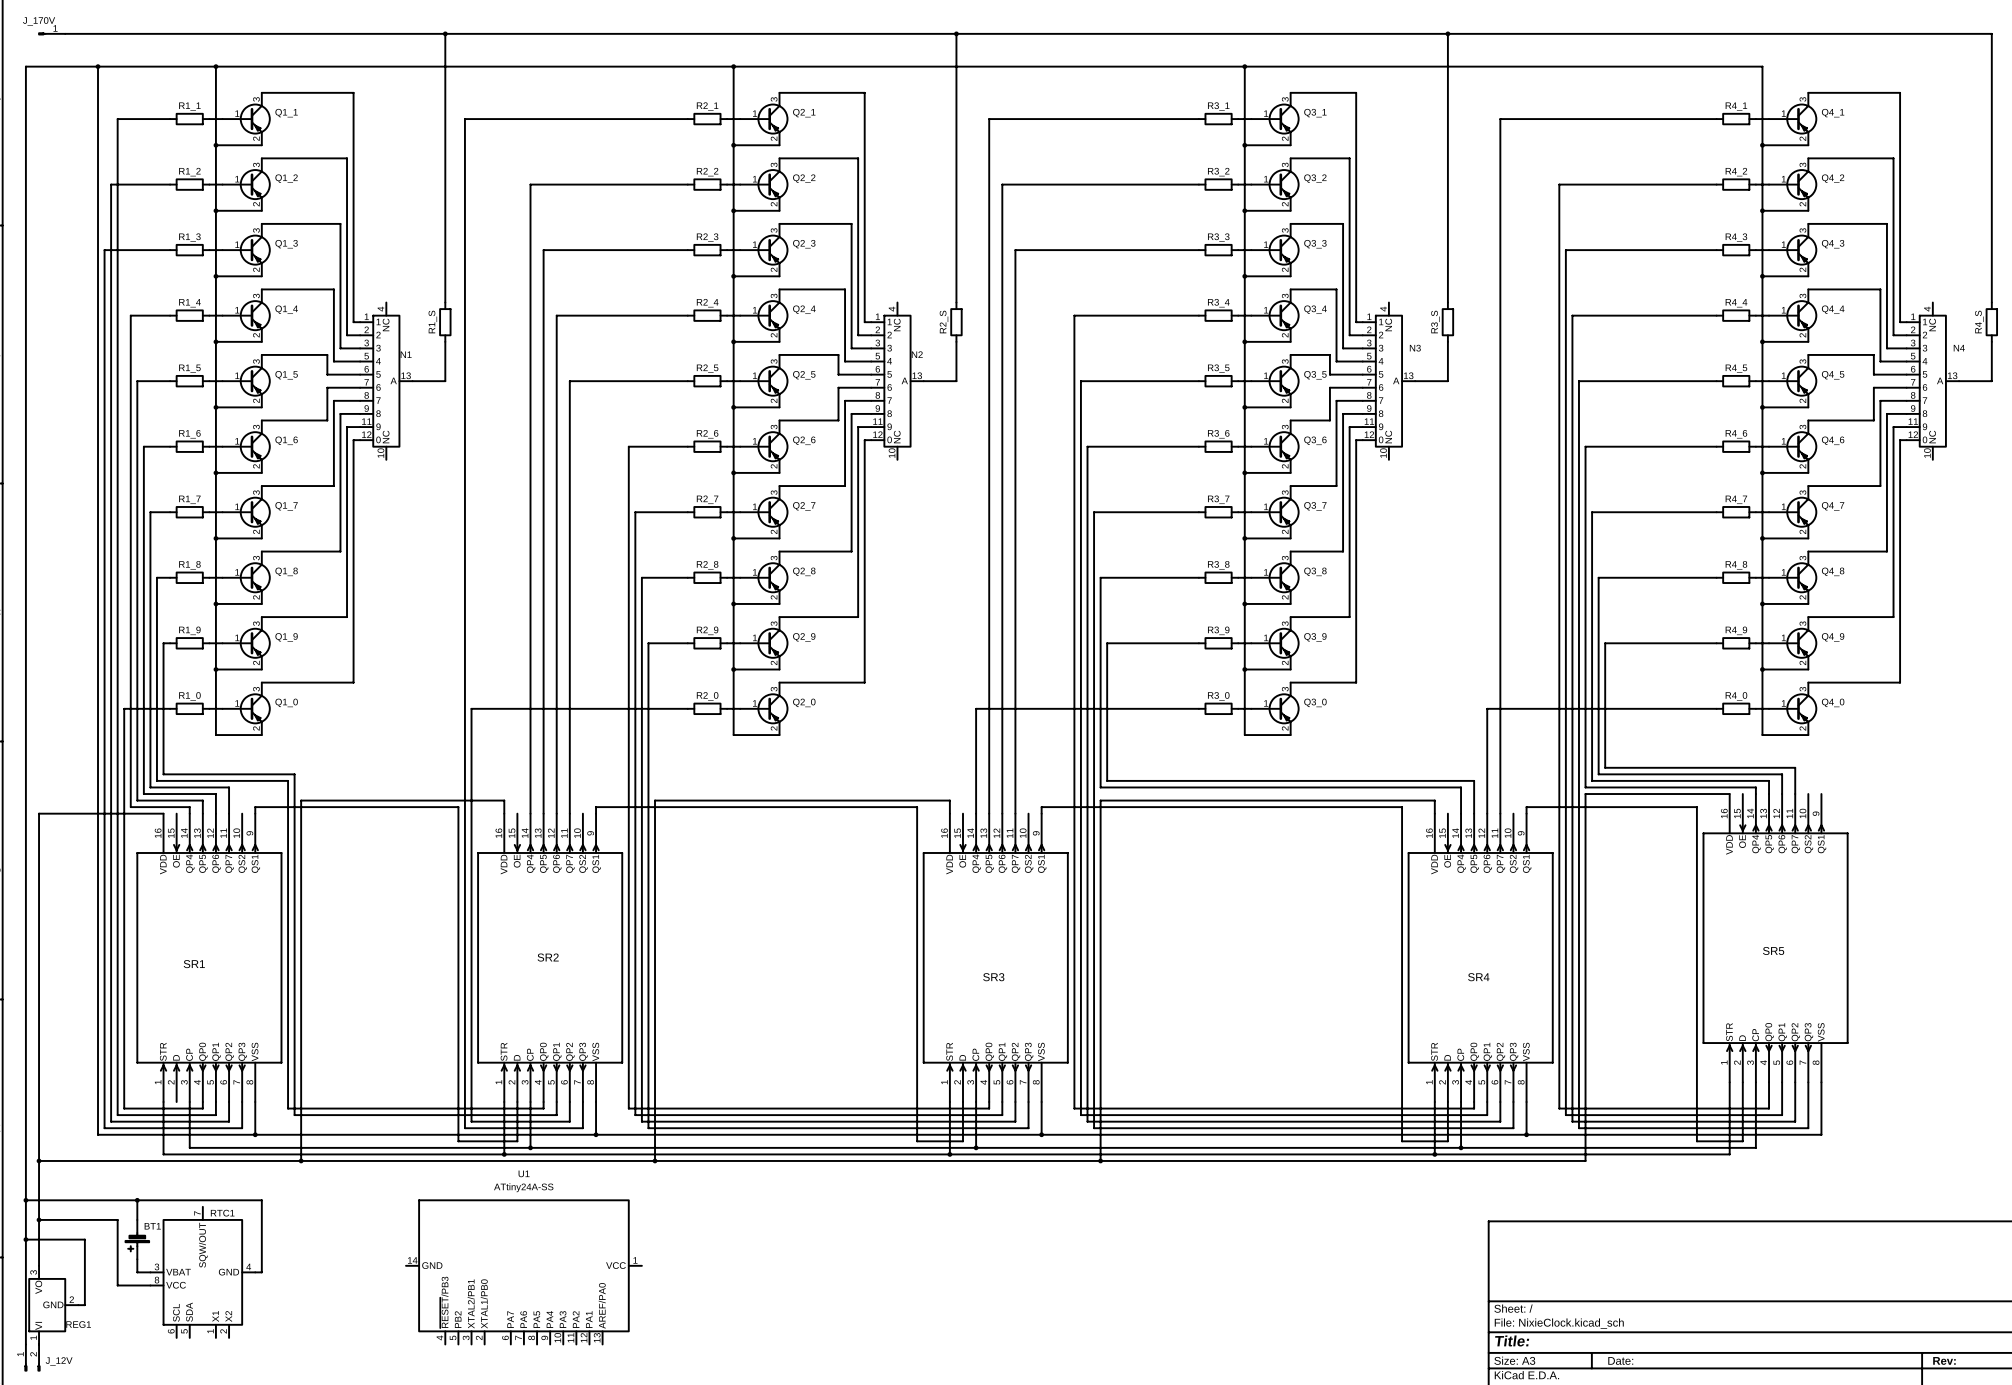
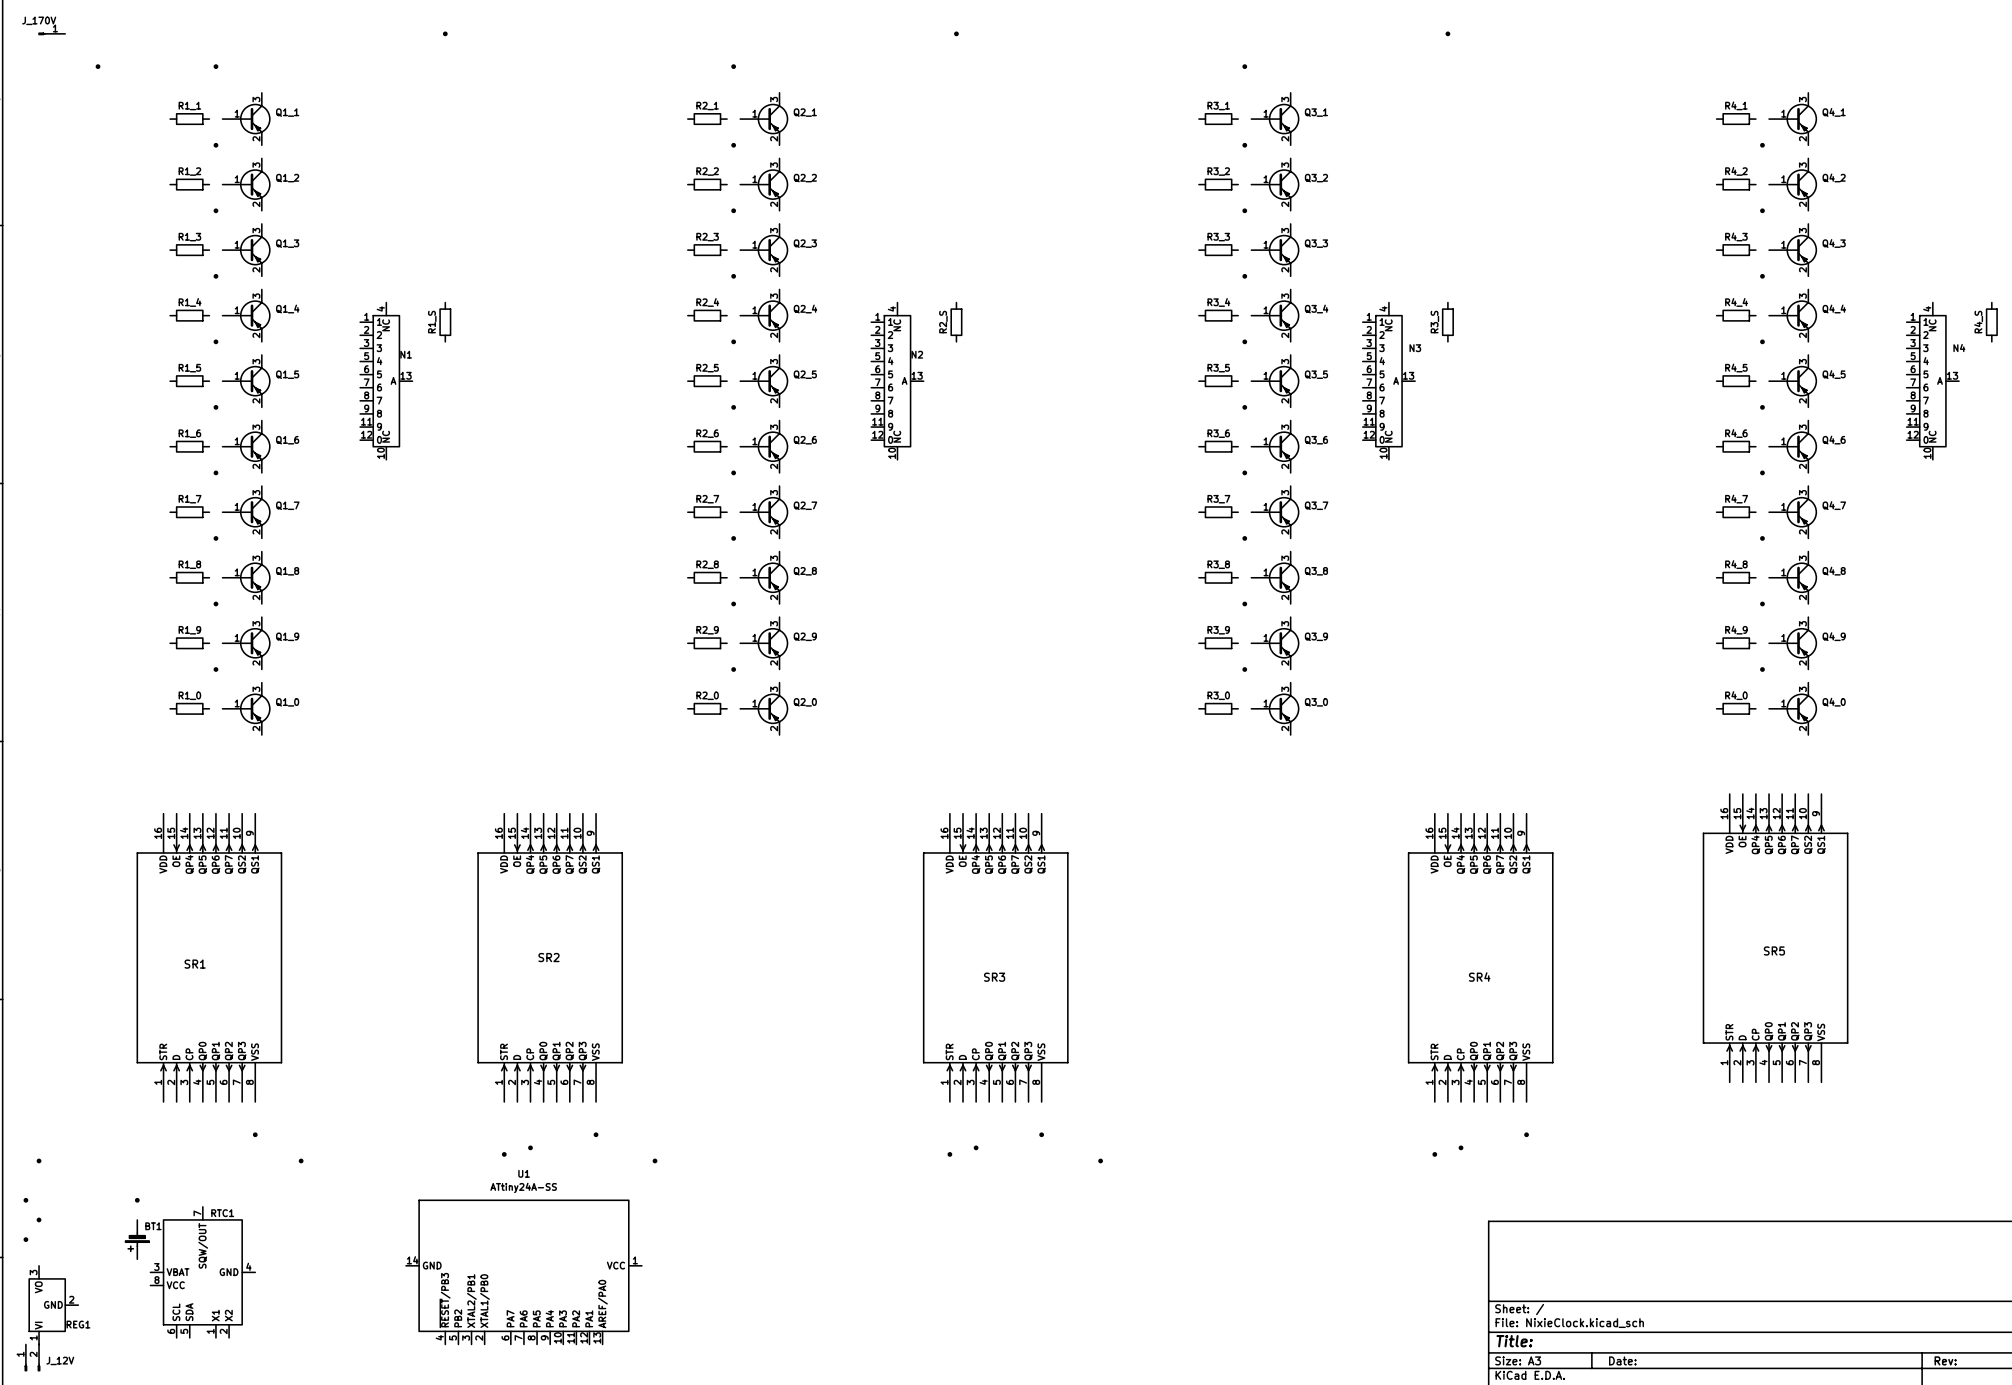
wire: (65, 33) (1991, 33) (1991, 302) -> none
wire: (445, 33) (445, 302) -> none
wire: (956, 33) (956, 302) -> none
wire: (1447, 33) (1447, 302) -> none
wire: (98, 66) (98, 1134) (1821, 1134) (1821, 1082) -> none
wire: (215, 66) (215, 735) (261, 735) -> none
wire: (733, 66) (733, 735) (779, 735) -> none
wire: (1244, 66) (1244, 735) (1290, 735) -> none
wire: (261, 92) (353, 92) (353, 322) (360, 322) -> none
wire: (779, 92) (864, 92) (864, 322) (871, 322) -> none
wire: (1290, 92) (1356, 92) (1356, 322) (1362, 322) -> none
wire: (1808, 92) (1900, 92) (1900, 322) (1906, 322) -> none
wire: (170, 119) (117, 119) (117, 1115) (215, 1115) (215, 1102) -> none
wire: (209, 119) (222, 119) -> none
wire: (687, 119) (464, 119) (464, 1128) (582, 1128) (582, 1102) -> none
wire: (727, 119) (740, 119) -> none
wire: (1198, 119) (989, 119) (989, 813) -> none
wire: (1238, 119) (1251, 119) -> none
wire: (1716, 119) (1500, 119) (1500, 813) -> none
wire: (1755, 119) (1769, 119) -> none
wire: (215, 145) (261, 145) -> none
wire: (733, 145) (779, 145) -> none
wire: (1244, 145) (1290, 145) -> none
wire: (1762, 145) (1808, 145) -> none
wire: (261, 158) (347, 158) (347, 335) (360, 335) -> none
wire: (779, 158) (858, 158) (858, 335) (871, 335) -> none
wire: (1290, 158) (1349, 158) (1349, 335) (1362, 335) -> none
wire: (1808, 158) (1893, 158) (1893, 335) (1906, 335) -> none
wire: (170, 184) (111, 184) (111, 1121) (229, 1121) (229, 1102) -> none
wire: (209, 184) (222, 184) -> none
wire: (687, 184) (530, 184) (530, 813) -> none
wire: (727, 184) (740, 184) -> none
wire: (1198, 184) (1002, 184) (1002, 813) -> none
wire: (1238, 184) (1251, 184) -> none
wire: (1716, 184) (1559, 184) (1559, 1108) (1769, 1108) (1769, 1082) -> none
wire: (1755, 184) (1769, 184) -> none
wire: (215, 210) (261, 210) -> none
wire: (733, 210) (779, 210) -> none
wire: (1244, 210) (1290, 210) -> none
wire: (1762, 210) (1808, 210) -> none
wire: (261, 223) (340, 223) (340, 348) (360, 348) -> none
wire: (779, 223) (851, 223) (851, 348) (871, 348) -> none
wire: (1290, 223) (1343, 223) (1343, 348) (1362, 348) -> none
wire: (1808, 223) (1886, 223) (1886, 348) (1906, 348) -> none
wire: (170, 250) (104, 250) (104, 1128) (242, 1128) (242, 1102) -> none
wire: (209, 250) (222, 250) -> none
wire: (687, 250) (543, 250) (543, 813) -> none
wire: (727, 250) (740, 250) -> none
wire: (1198, 250) (1015, 250) (1015, 813) -> none
wire: (1238, 250) (1251, 250) -> none
wire: (1716, 250) (1565, 250) (1565, 1115) (1782, 1115) (1782, 1082) -> none
wire: (1755, 250) (1769, 250) -> none
wire: (215, 276) (261, 276) -> none
wire: (733, 276) (779, 276) -> none
wire: (1244, 276) (1290, 276) -> none
wire: (1762, 276) (1808, 276) -> none
wire: (261, 289) (333, 289) (333, 361) (360, 361) -> none
wire: (779, 289) (845, 289) (845, 361) (871, 361) -> none
wire: (1290, 289) (1336, 289) (1336, 361) (1362, 361) -> none
wire: (1808, 289) (1880, 289) (1880, 361) (1906, 361) -> none
wire: (170, 315) (130, 315) (130, 807) (189, 807) (189, 813) -> none
wire: (209, 315) (222, 315) -> none
wire: (687, 315) (556, 315) (556, 813) -> none
wire: (727, 315) (740, 315) -> none
wire: (1198, 315) (1074, 315) (1074, 1108) (1474, 1108) (1474, 1102) -> none
wire: (1238, 315) (1251, 315) -> none
wire: (1716, 315) (1572, 315) (1572, 1121) (1795, 1121) (1795, 1082) -> none
wire: (1755, 315) (1769, 315) -> none
wire: (215, 341) (261, 341) -> none
wire: (445, 341) (445, 381) (412, 381) -> none
wire: (733, 341) (779, 341) -> none
wire: (956, 341) (956, 381) (923, 381) -> none
wire: (1244, 341) (1290, 341) -> none
wire: (1447, 341) (1447, 381) (1415, 381) -> none
wire: (1762, 341) (1808, 341) -> none
wire: (1991, 341) (1991, 381) (1959, 381) -> none
wire: (261, 354) (327, 354) (327, 374) (360, 374) -> none
wire: (779, 354) (838, 354) (838, 374) (871, 374) -> none
wire: (1290, 354) (1329, 354) (1329, 374) (1362, 374) -> none
wire: (1808, 354) (1873, 354) (1873, 374) (1906, 374) -> none
wire: (170, 381) (137, 381) (137, 800) (202, 800) (202, 813) -> none
wire: (209, 381) (222, 381) -> none
wire: (687, 381) (569, 381) (569, 813) -> none
wire: (727, 381) (740, 381) -> none
wire: (1198, 381) (1080, 381) (1080, 1115) (1487, 1115) (1487, 1102) -> none
wire: (1238, 381) (1251, 381) -> none
wire: (1716, 381) (1578, 381) (1578, 1128) (1808, 1128) (1808, 1082) -> none
wire: (1755, 381) (1769, 381) -> none
wire: (360, 387) (327, 387) (327, 420) (261, 420) -> none
wire: (871, 387) (838, 387) (838, 420) (779, 420) -> none
wire: (1362, 387) (1329, 387) (1329, 420) (1290, 420) -> none
wire: (1906, 387) (1873, 387) (1873, 420) (1808, 420) -> none
wire: (360, 400) (333, 400) (333, 486) (261, 486) -> none
wire: (871, 400) (845, 400) (845, 486) (779, 486) -> none
wire: (1362, 400) (1336, 400) (1336, 486) (1290, 486) -> none
wire: (1906, 400) (1880, 400) (1880, 486) (1808, 486) -> none
wire: (215, 407) (261, 407) -> none
wire: (733, 407) (779, 407) -> none
wire: (1244, 407) (1290, 407) -> none
wire: (1762, 407) (1808, 407) -> none
wire: (360, 413) (340, 413) (340, 551) (261, 551) -> none
wire: (871, 413) (851, 413) (851, 551) (779, 551) -> none
wire: (1362, 413) (1343, 413) (1343, 551) (1290, 551) -> none
wire: (1906, 413) (1886, 413) (1886, 551) (1808, 551) -> none
wire: (360, 427) (347, 427) (347, 617) (261, 617) -> none
wire: (871, 427) (858, 427) (858, 617) (779, 617) -> none
wire: (1362, 427) (1349, 427) (1349, 617) (1290, 617) -> none
wire: (1906, 427) (1893, 427) (1893, 617) (1808, 617) -> none
wire: (360, 440) (353, 440) (353, 682) (261, 682) -> none
wire: (871, 440) (864, 440) (864, 682) (779, 682) -> none
wire: (1362, 440) (1356, 440) (1356, 682) (1290, 682) -> none
wire: (1906, 440) (1900, 440) (1900, 682) (1808, 682) -> none
wire: (170, 446) (143, 446) (143, 794) (215, 794) (215, 813) -> none
wire: (209, 446) (222, 446) -> none
wire: (687, 446) (628, 446) (628, 1108) (989, 1108) (989, 1102) -> none
wire: (727, 446) (740, 446) -> none
wire: (1198, 446) (1087, 446) (1087, 1121) (1500, 1121) (1500, 1102) -> none
wire: (1238, 446) (1251, 446) -> none
wire: (1716, 446) (1585, 446) (1585, 787) (1755, 787) (1755, 794) -> none
wire: (1755, 446) (1769, 446) -> none
wire: (215, 472) (261, 472) -> none
wire: (733, 472) (779, 472) -> none
wire: (1244, 472) (1290, 472) -> none
wire: (1762, 472) (1808, 472) -> none
wire: (170, 512) (150, 512) (150, 787) (229, 787) (229, 813) -> none
wire: (209, 512) (222, 512) -> none
wire: (687, 512) (635, 512) (635, 1115) (1002, 1115) (1002, 1102) -> none
wire: (727, 512) (740, 512) -> none
wire: (1198, 512) (1094, 512) (1094, 1128) (1513, 1128) (1513, 1102) -> none
wire: (1238, 512) (1251, 512) -> none
wire: (1716, 512) (1592, 512) (1592, 780) (1769, 780) (1769, 794) -> none
wire: (1755, 512) (1769, 512) -> none
wire: (215, 538) (261, 538) -> none
wire: (733, 538) (779, 538) -> none
wire: (1244, 538) (1290, 538) -> none
wire: (1762, 538) (1808, 538) -> none
wire: (170, 577) (156, 577) (156, 780) (288, 780) (288, 1108) (543, 1108) (543, 1102) -> none
wire: (209, 577) (222, 577) -> none
wire: (687, 577) (641, 577) (641, 1121) (1015, 1121) (1015, 1102) -> none
wire: (727, 577) (740, 577) -> none
wire: (1198, 577) (1100, 577) (1100, 787) (1461, 787) (1461, 813) -> none
wire: (1238, 577) (1251, 577) -> none
wire: (1716, 577) (1598, 577) (1598, 774) (1782, 774) (1782, 794) -> none
wire: (1755, 577) (1769, 577) -> none
wire: (215, 603) (261, 603) -> none
wire: (733, 603) (779, 603) -> none
wire: (1244, 603) (1290, 603) -> none
wire: (1762, 603) (1808, 603) -> none
wire: (170, 643) (163, 643) (163, 774) (294, 774) (294, 1115) (556, 1115) (556, 1102) -> none
wire: (209, 643) (222, 643) -> none
wire: (687, 643) (648, 643) (648, 1128) (1028, 1128) (1028, 1102) -> none
wire: (727, 643) (740, 643) -> none
wire: (1198, 643) (1107, 643) (1107, 780) (1474, 780) (1474, 813) -> none
wire: (1238, 643) (1251, 643) -> none
wire: (1716, 643) (1605, 643) (1605, 767) (1795, 767) (1795, 794) -> none
wire: (1755, 643) (1769, 643) -> none
wire: (215, 669) (261, 669) -> none
wire: (733, 669) (779, 669) -> none
wire: (1244, 669) (1290, 669) -> none
wire: (1762, 669) (1808, 669) -> none
wire: (170, 708) (124, 708) (124, 1108) (202, 1108) (202, 1102) -> none
wire: (209, 708) (222, 708) -> none
wire: (687, 708) (471, 708) (471, 1121) (569, 1121) (569, 1102) -> none
wire: (727, 708) (740, 708) -> none
wire: (1198, 708) (976, 708) (976, 813) -> none
wire: (1238, 708) (1251, 708) -> none
wire: (1716, 708) (1487, 708) (1487, 813) -> none
wire: (1755, 708) (1769, 708) -> none
wire: (1808, 735) (1762, 735) (1762, 66) (25, 66) (25, 1344) -> none
wire: (1729, 794) (1585, 794) (1585, 1160) (39, 1160) -> none
wire: (163, 813) (39, 813) (39, 1265) -> none
wire: (255, 813) (255, 807) (458, 807) (458, 1141) (517, 1141) (517, 1102) -> none
wire: (504, 813) (504, 800) (301, 800) (301, 1160) -> none
wire: (596, 813) (596, 807) (917, 807) (917, 1141) (963, 1141) (963, 1102) -> none
wire: (949, 813) (949, 800) (655, 800) (655, 1160) -> none
wire: (1041, 813) (1041, 807) (1402, 807) (1402, 1141) (1447, 1141) (1447, 1102) -> none
wire: (1434, 813) (1434, 800) (1100, 800) (1100, 1160) -> none
wire: (1526, 813) (1526, 807) (1696, 807) (1696, 1141) (1742, 1141) (1742, 1082) -> none
wire: (1729, 1082) (1729, 1154) (163, 1154) (163, 1102) -> none
wire: (1755, 1082) (1755, 1147) (189, 1147) (189, 1102) -> none
wire: (255, 1102) (255, 1134) -> none
wire: (504, 1102) (504, 1154) -> none
wire: (530, 1102) (530, 1147) -> none
wire: (596, 1102) (596, 1134) -> none
wire: (949, 1102) (949, 1154) -> none
wire: (976, 1102) (976, 1147) -> none
wire: (1041, 1102) (1041, 1134) -> none
wire: (1434, 1102) (1434, 1154) -> none
wire: (1461, 1102) (1461, 1147) -> none
wire: (1526, 1102) (1526, 1134) -> none
wire: (25, 1200) (261, 1200) (261, 1272) (255, 1272) -> none
wire: (137, 1200) (137, 1219) -> none
wire: (39, 1219) (117, 1219) (117, 1285) (150, 1285) -> none
wire: (25, 1239) (84, 1239) (84, 1305) (78, 1305) -> none
wire: (137, 1259) (137, 1272) (150, 1272) -> none

